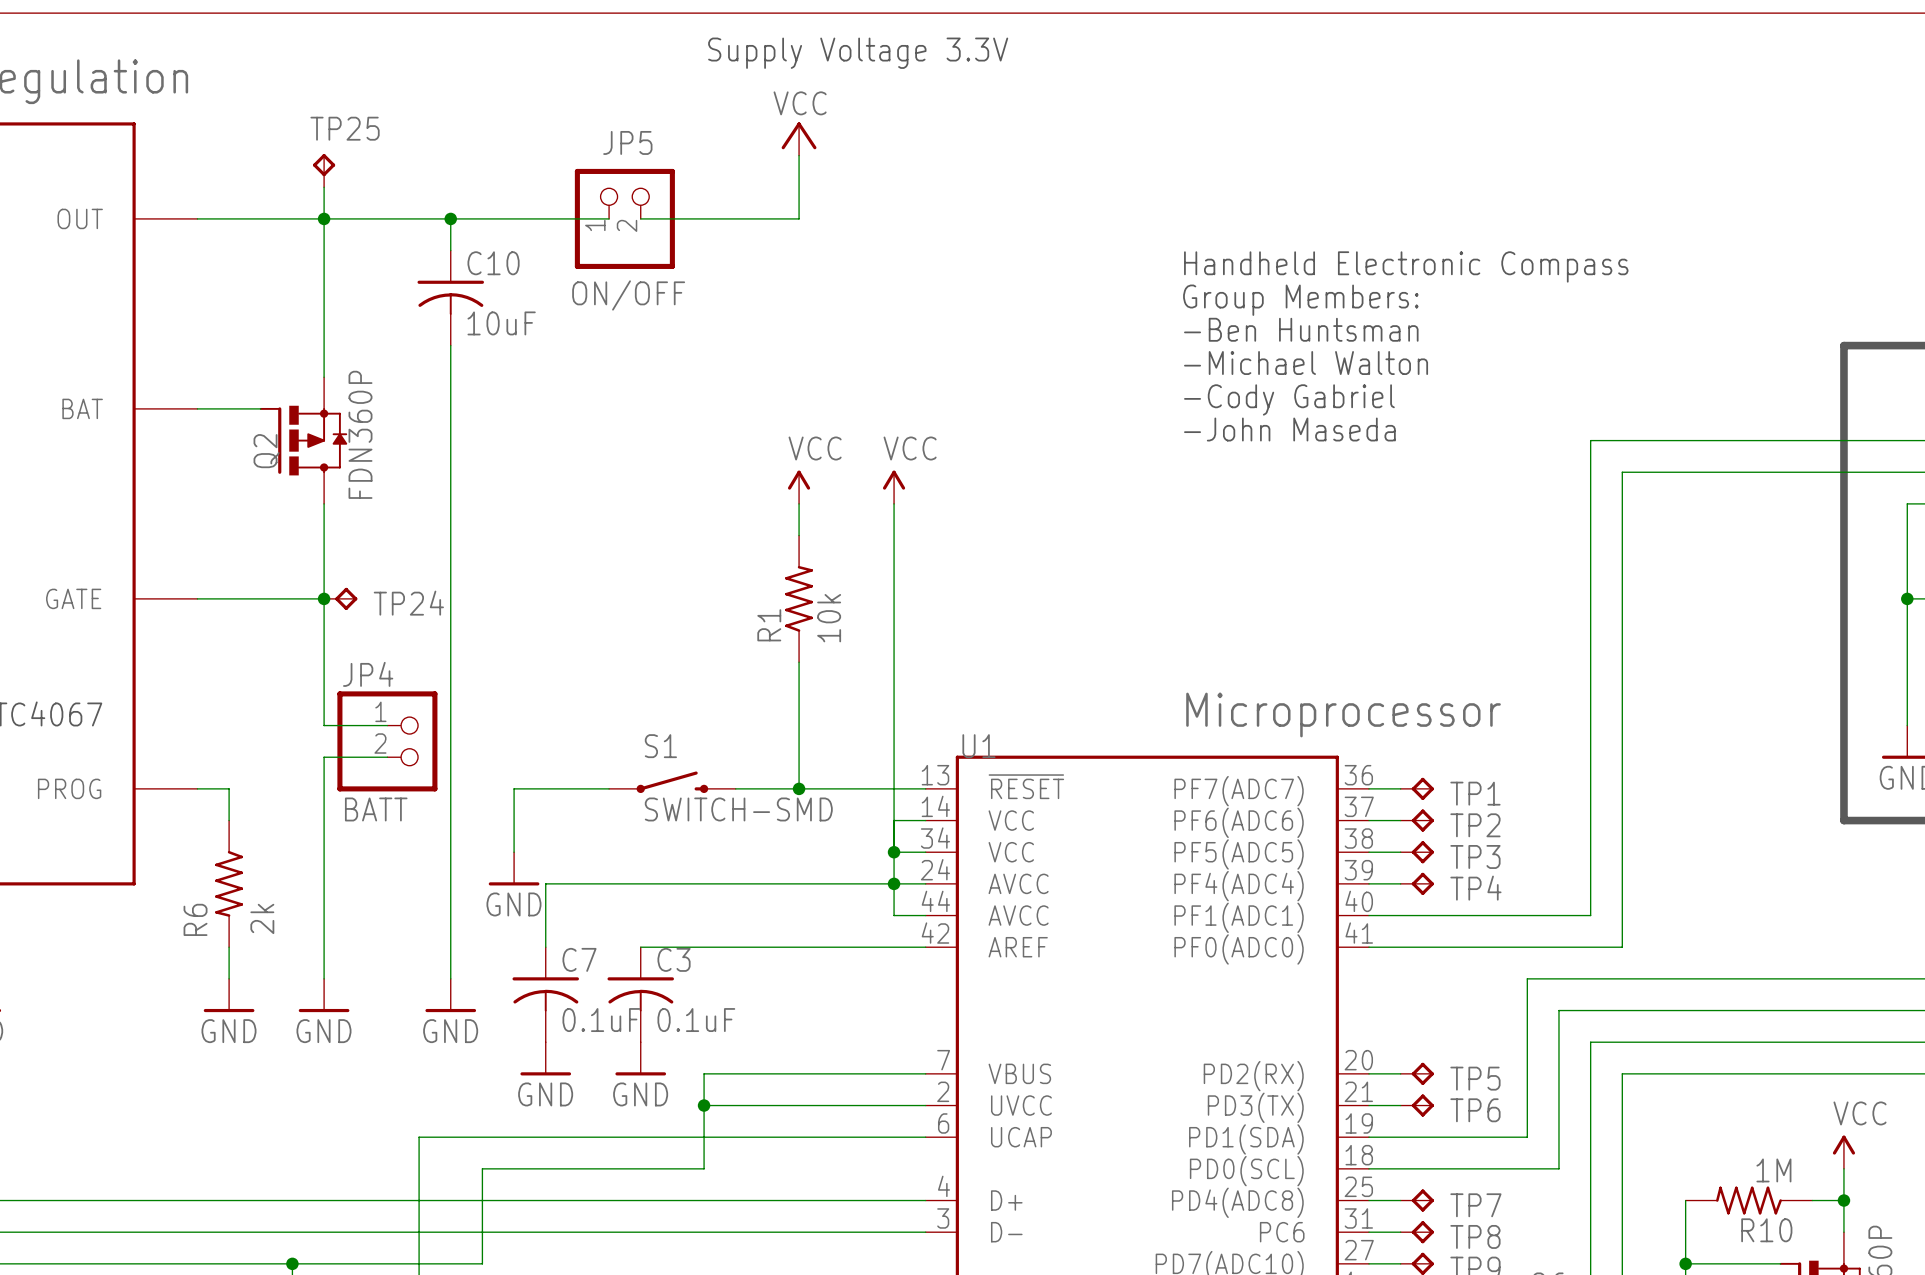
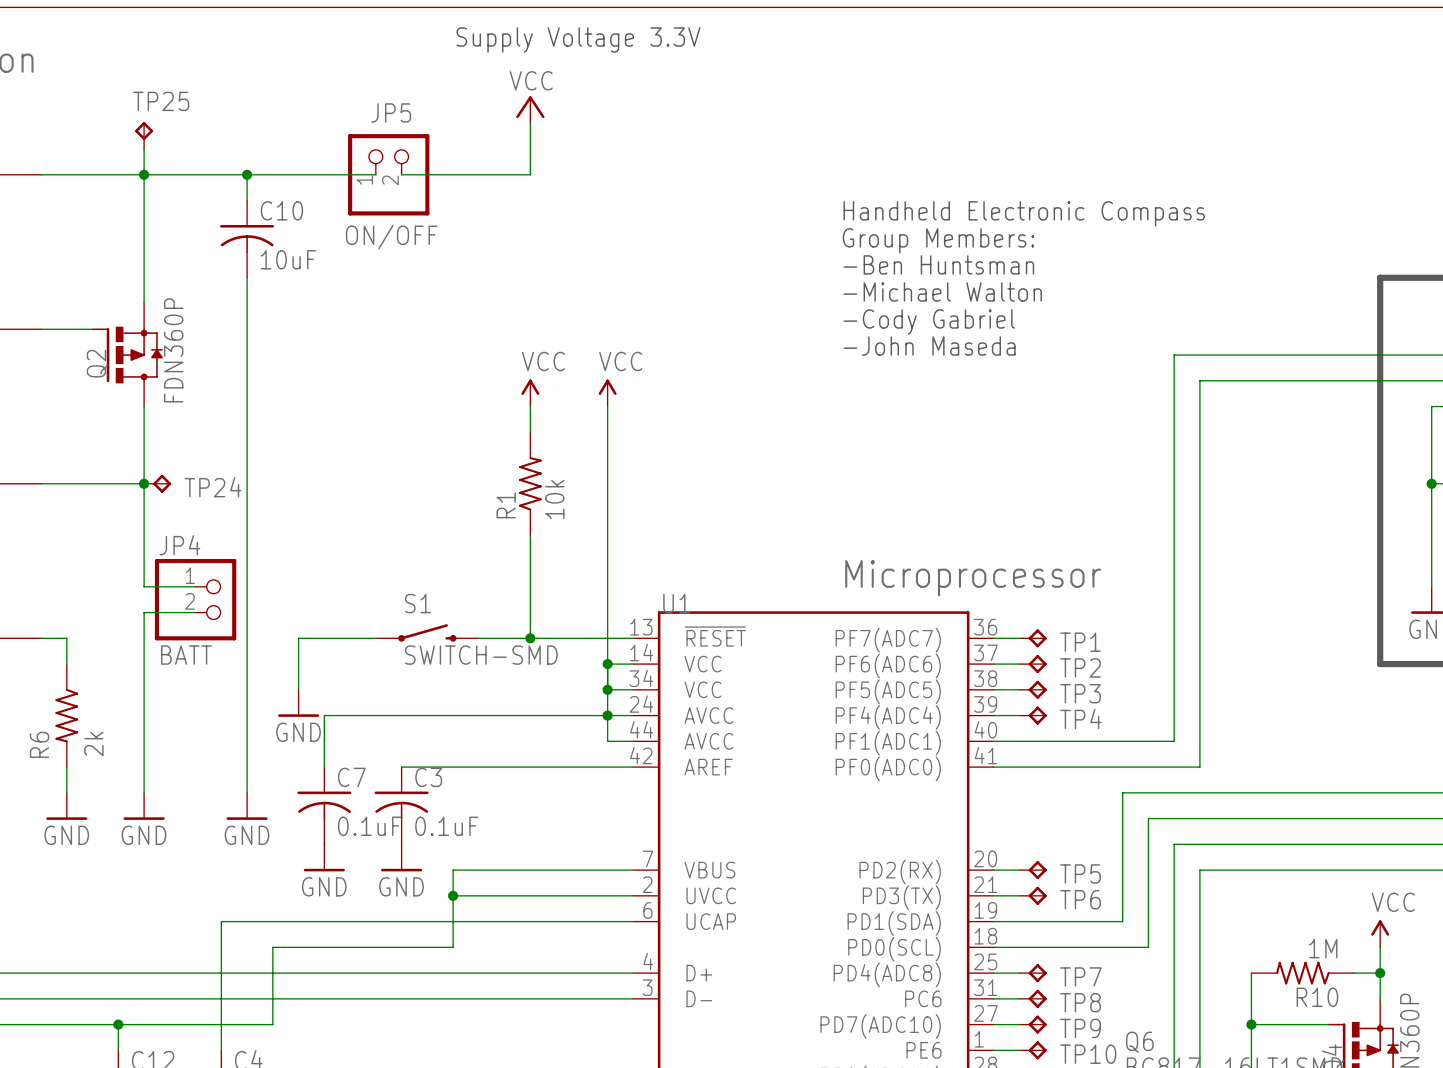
junction: none -> (607, 664)

